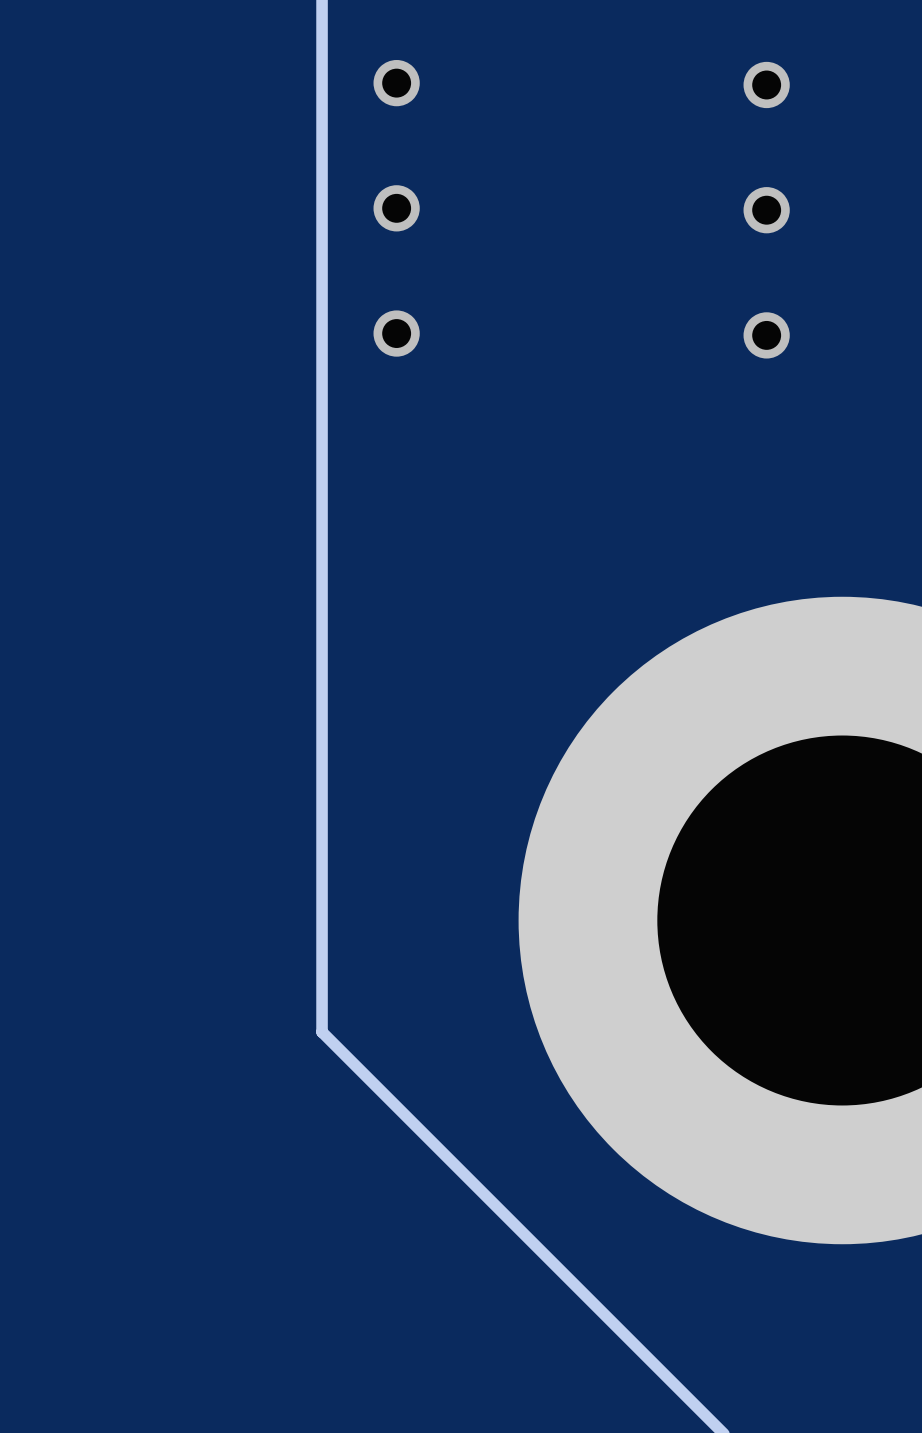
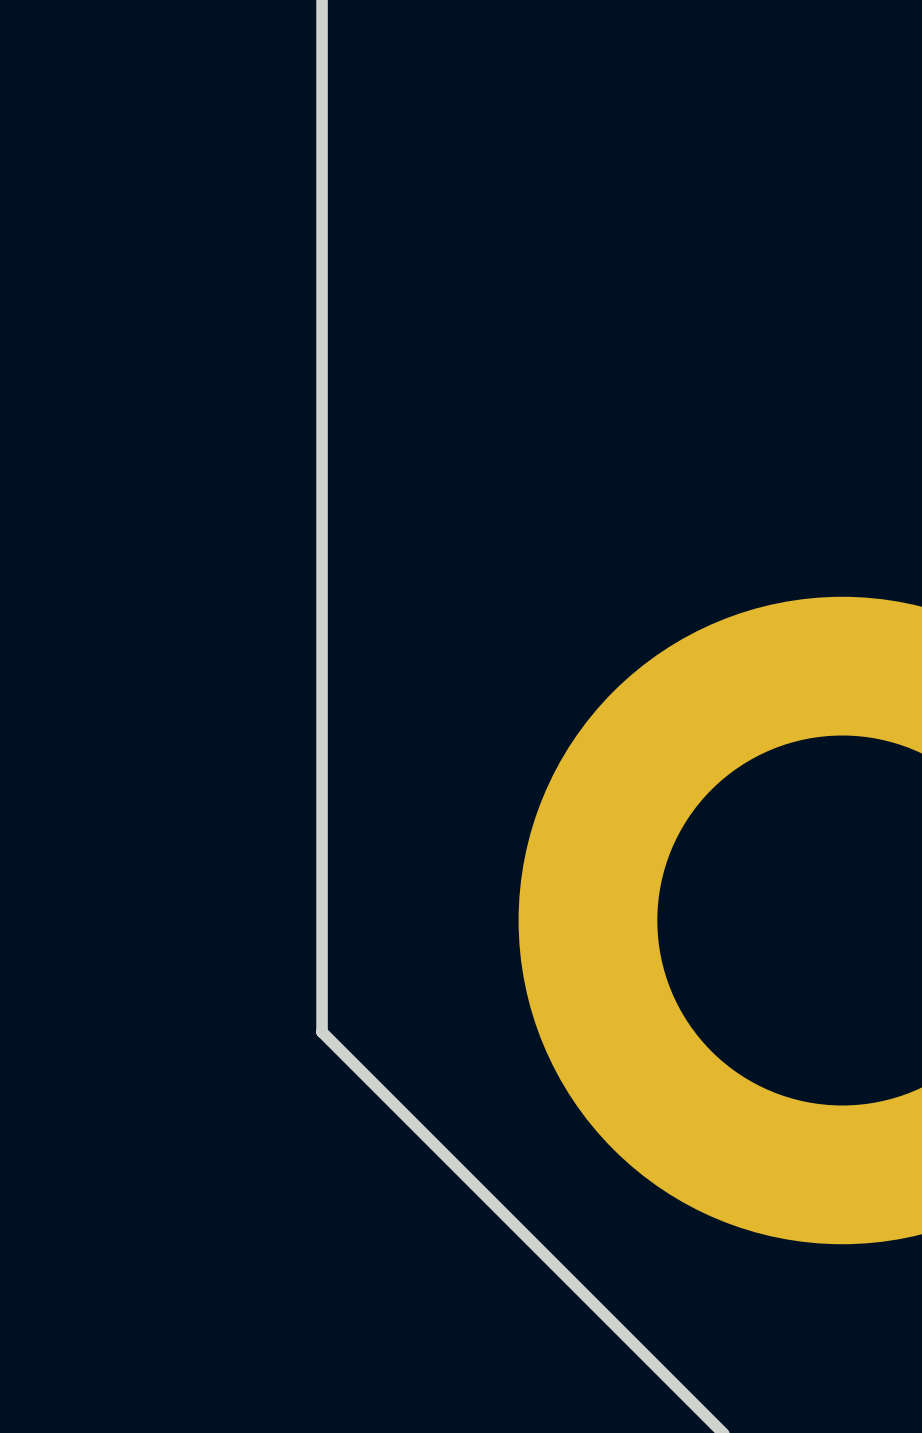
via: (396, 83) -> none
via: (766, 84) -> none
via: (396, 208) -> none
via: (766, 210) -> none
via: (396, 333) -> none
via: (766, 335) -> none

